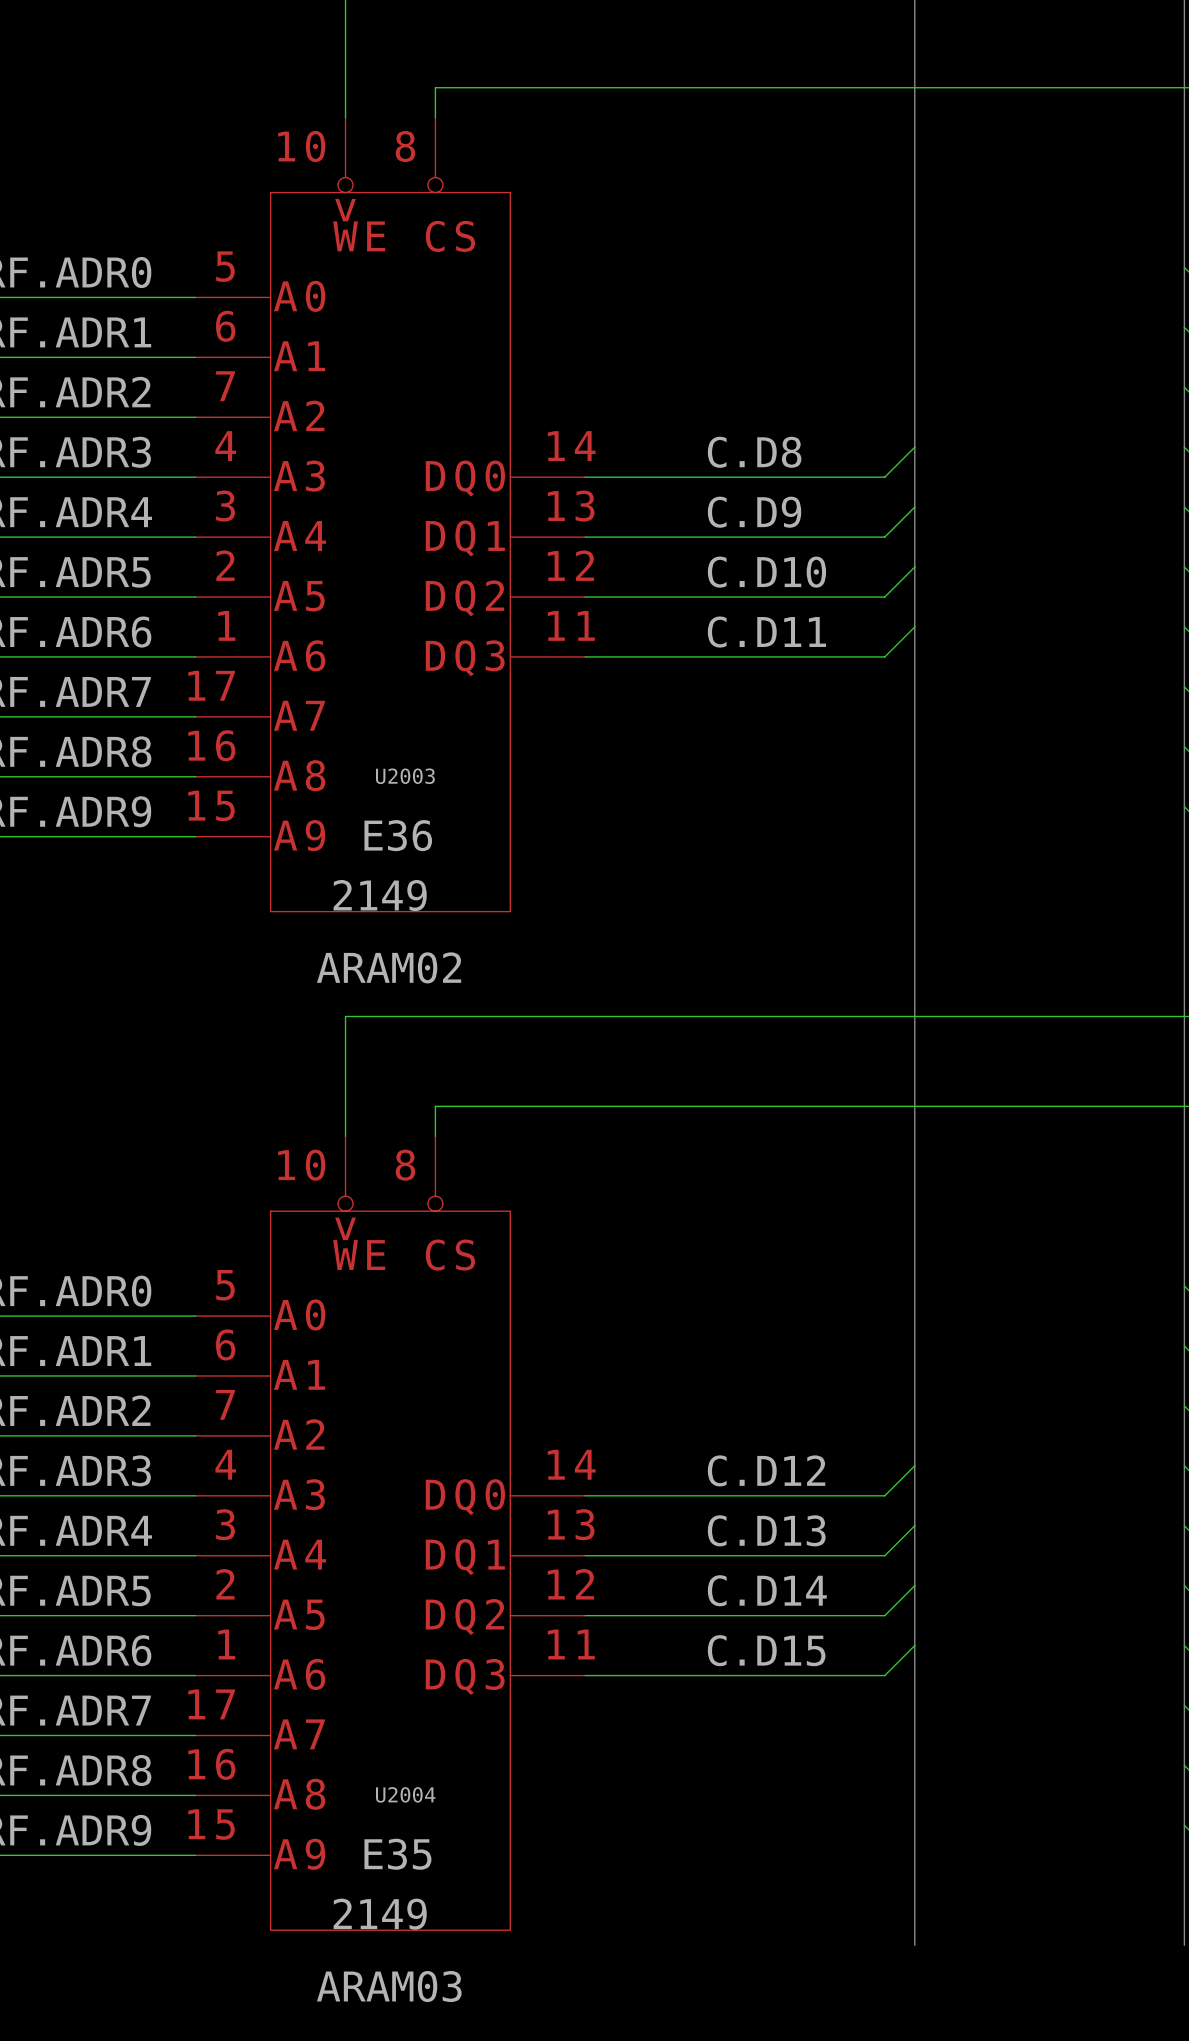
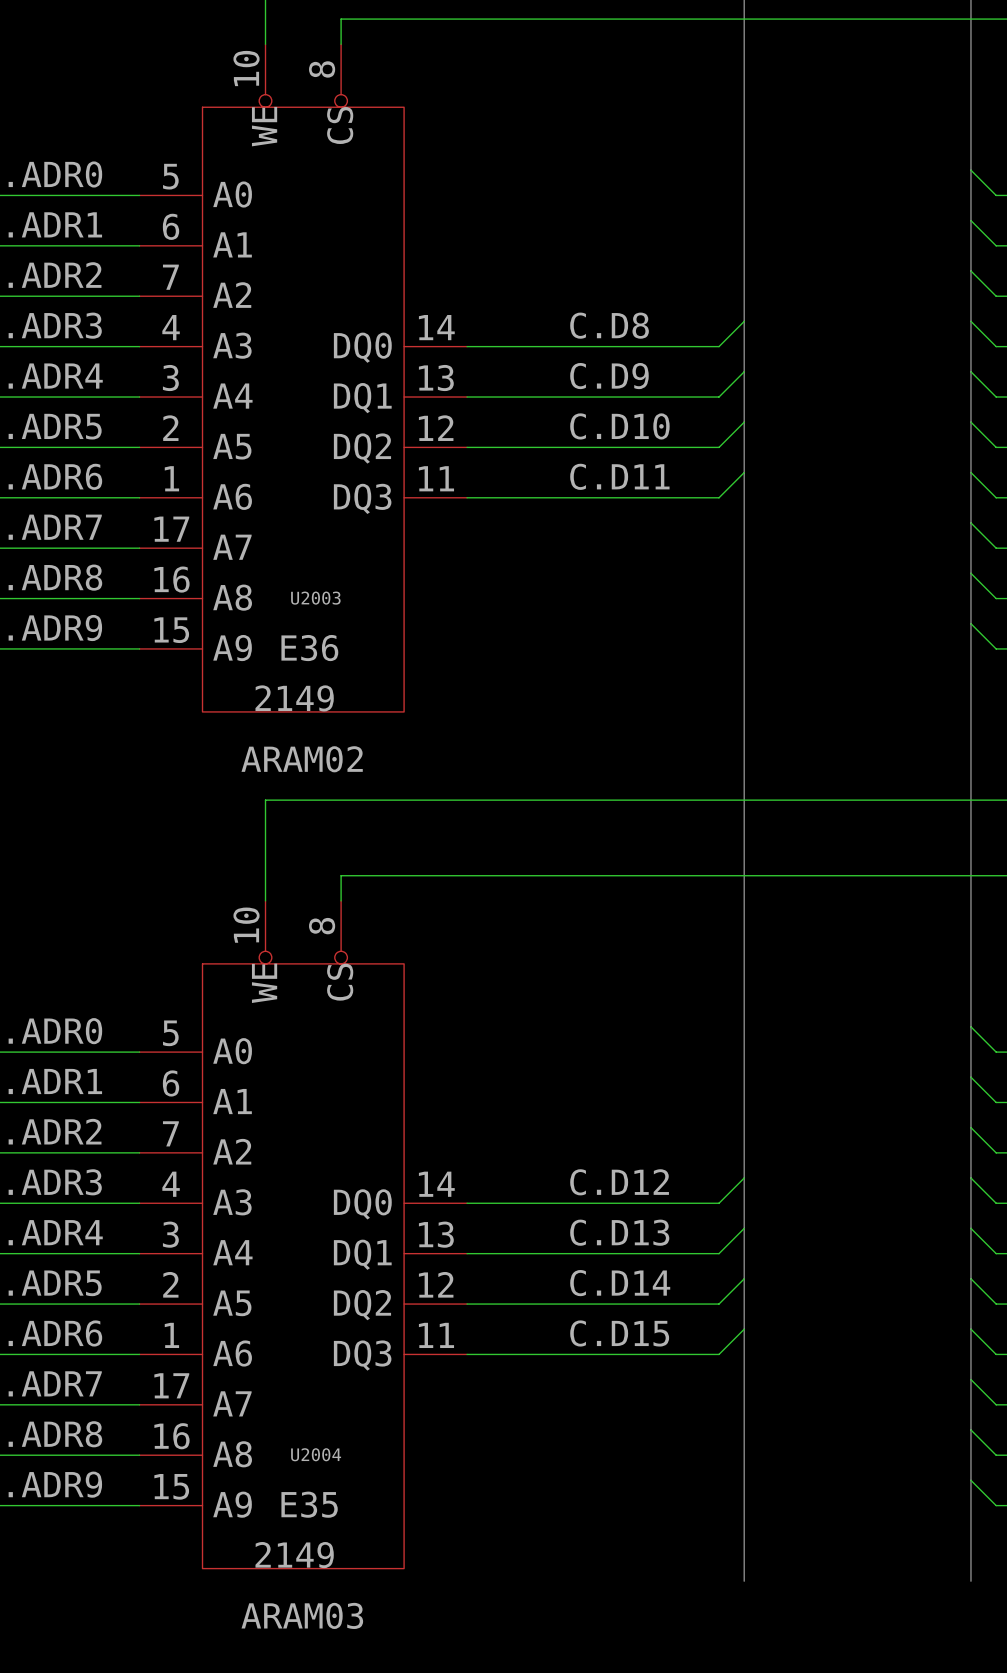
U2003 symbol: [195, 117, 586, 912] -> [139, 44, 468, 712]
U2004 symbol: [195, 1136, 586, 1931] -> [139, 900, 468, 1569]

